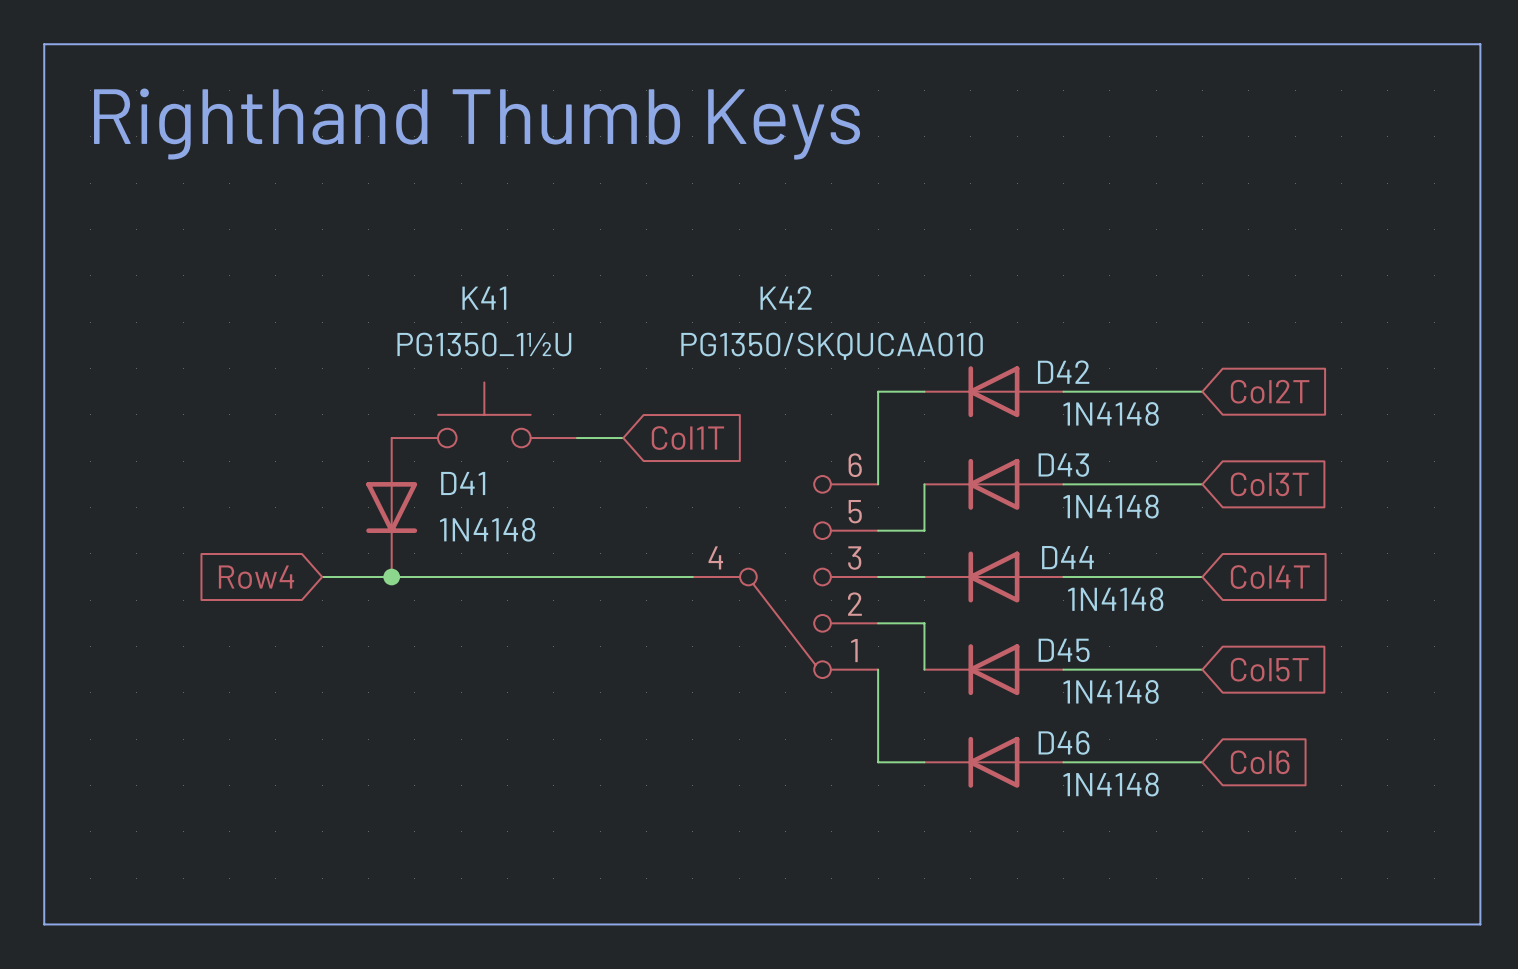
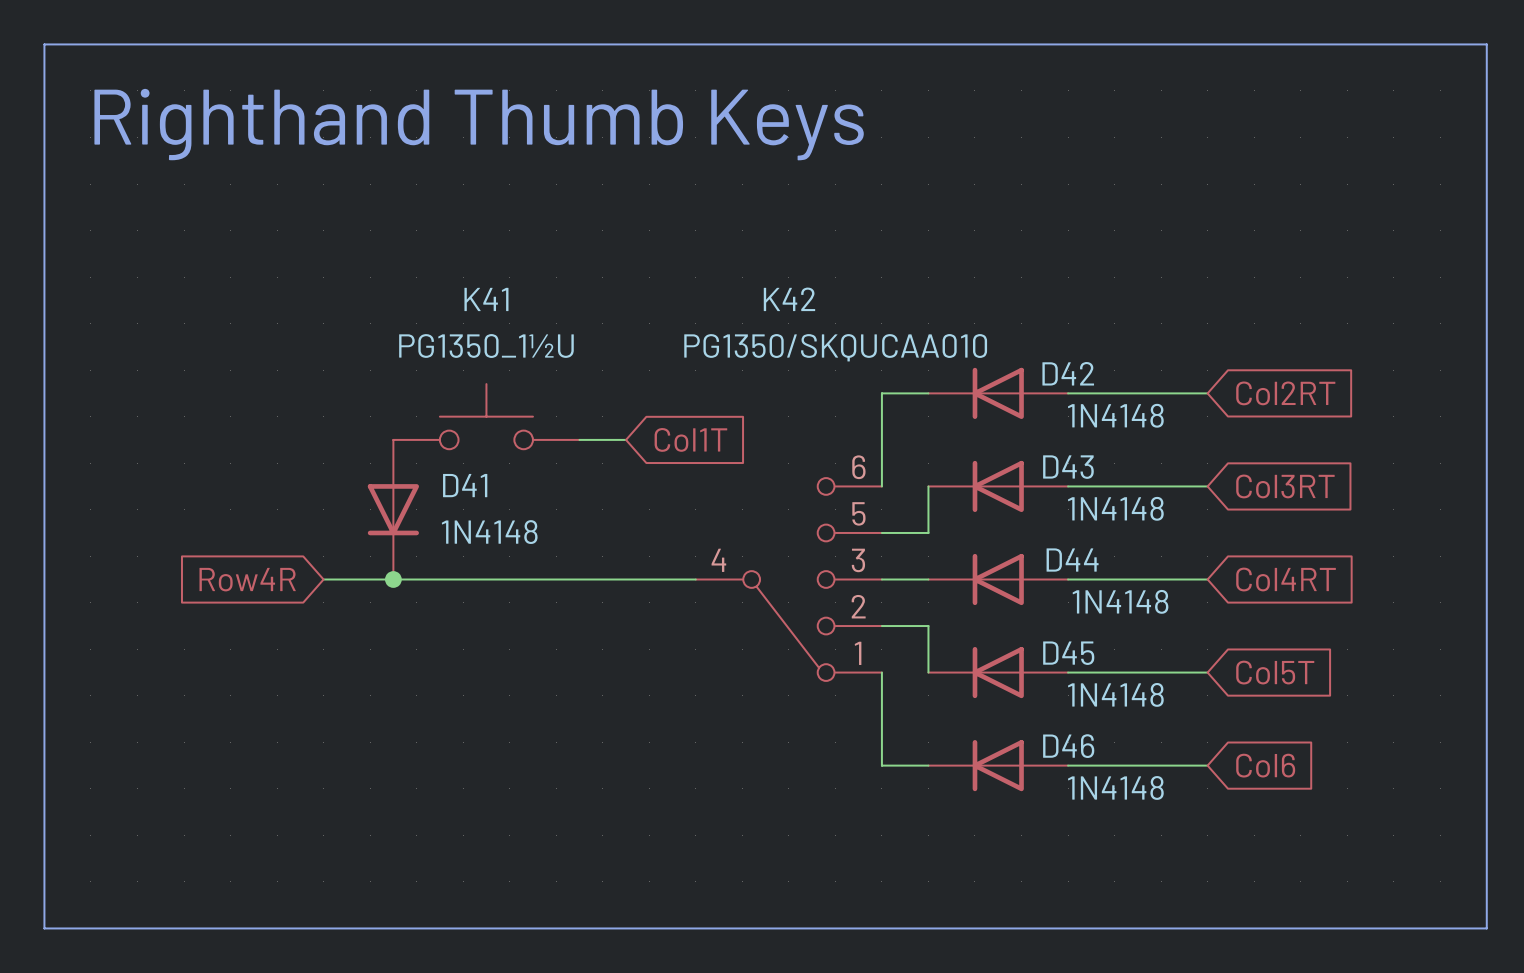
global label: Col2T (1270, 391) -> Col2RT (1285, 393)
global label: Col3T (1269, 484) -> Col3RT (1285, 486)
global label: Row4 (256, 577) -> Row4R (247, 579)
global label: Col4T (1270, 577) -> Col4RT (1286, 579)

